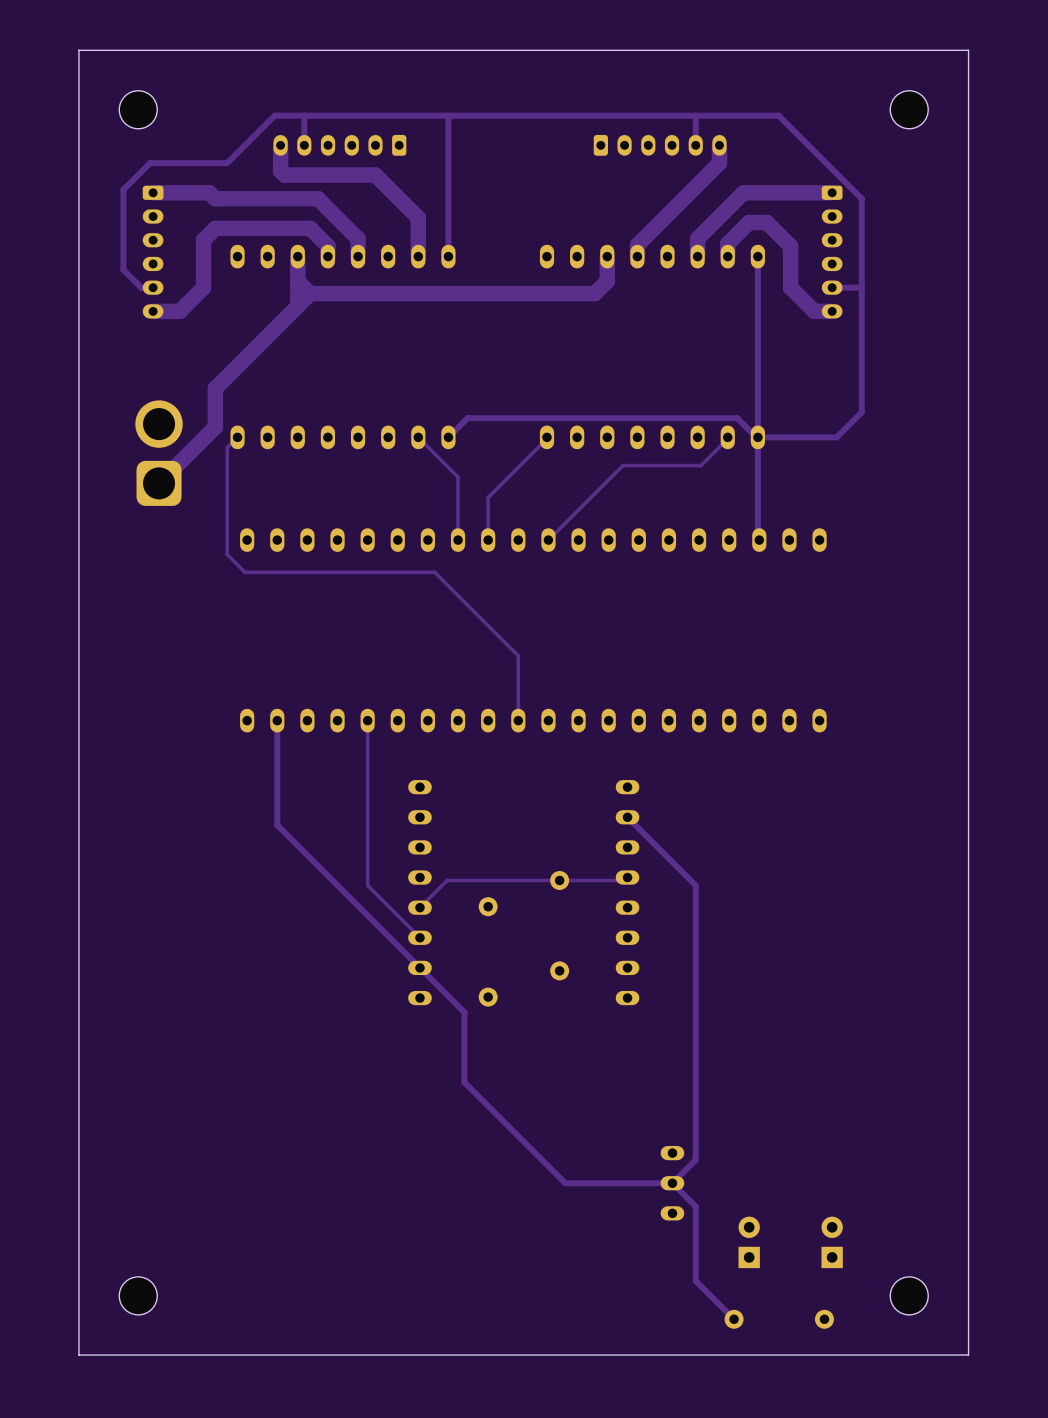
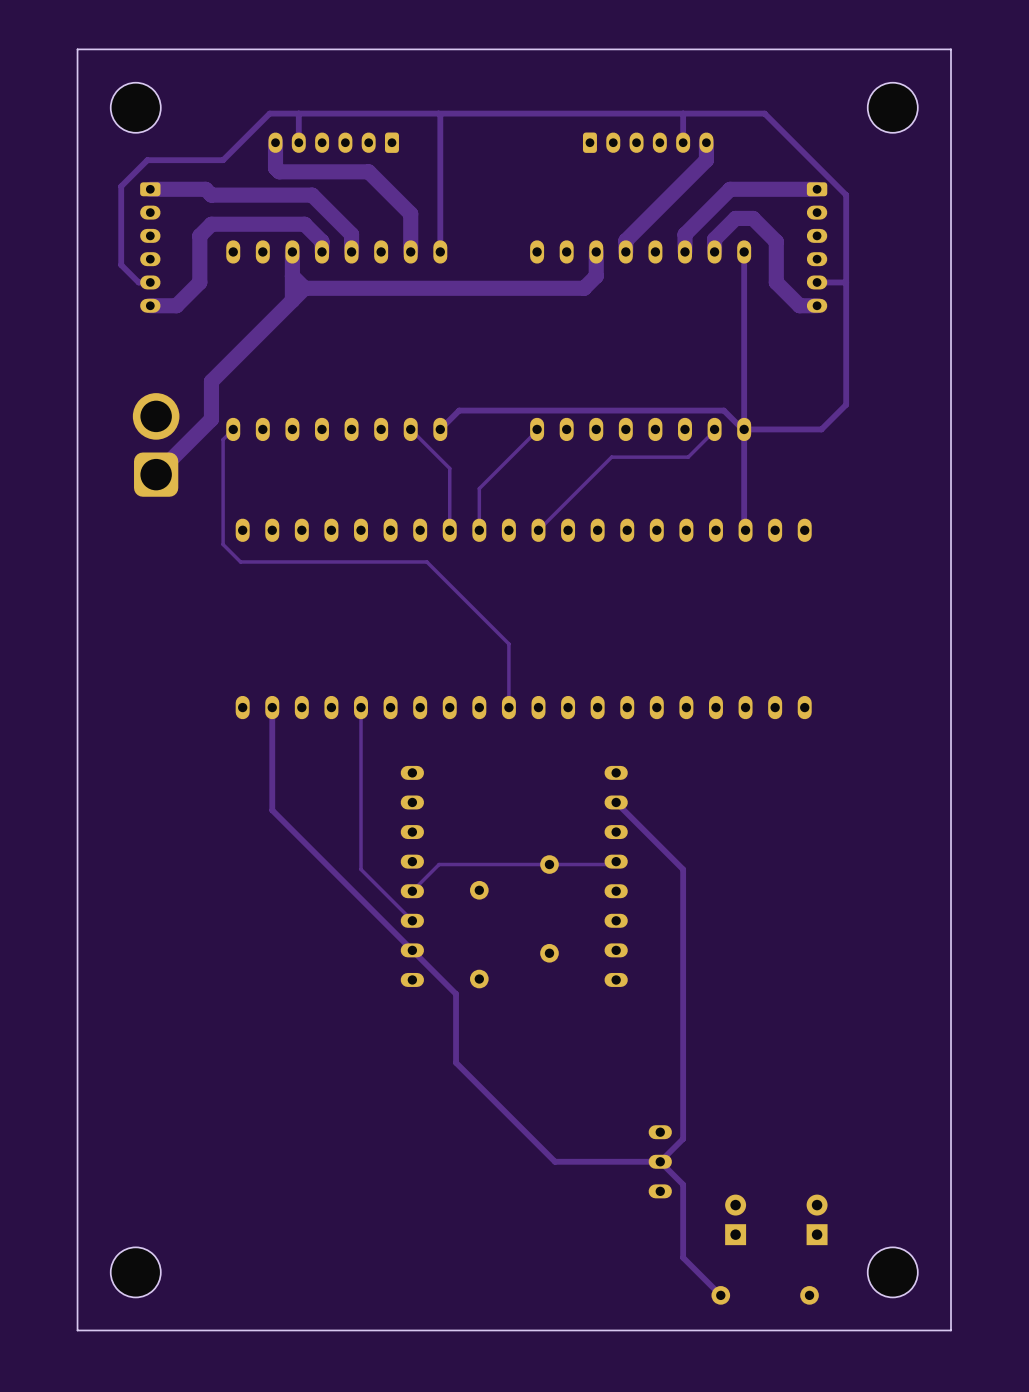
part footprint: [119, 90, 158, 129] -> [110, 82, 161, 133]
part footprint: [890, 90, 929, 129] -> [867, 82, 918, 133]
part footprint: [119, 1276, 158, 1315] -> [110, 1247, 161, 1298]
part footprint: [890, 1276, 929, 1315] -> [867, 1247, 918, 1298]

